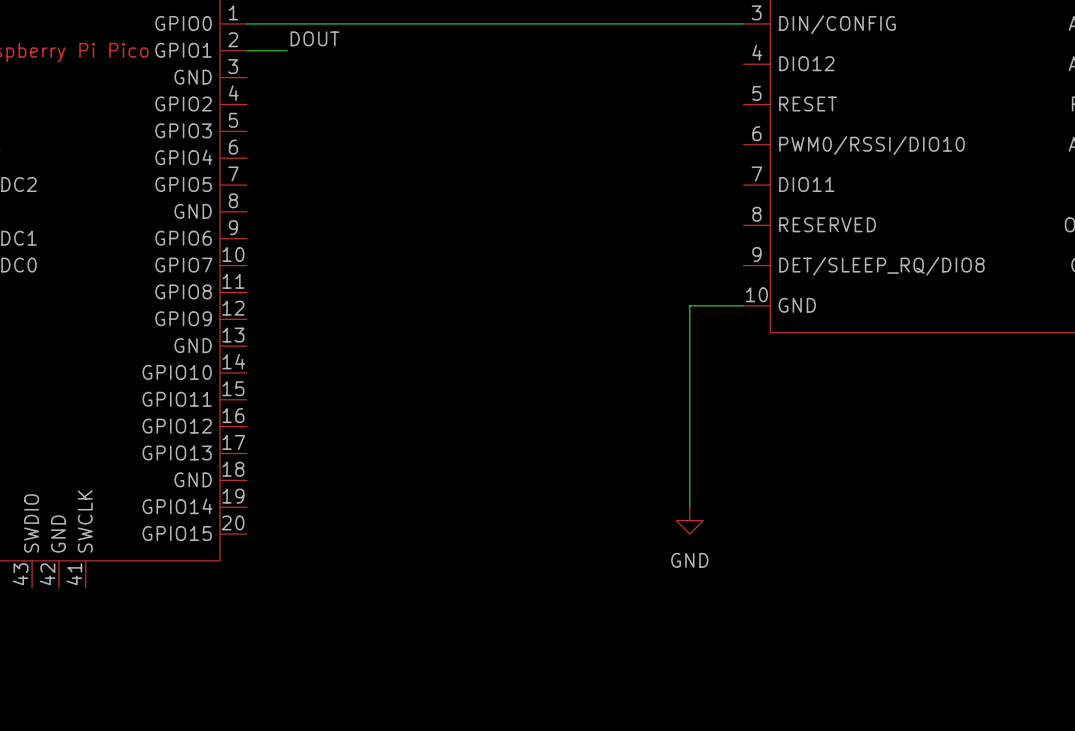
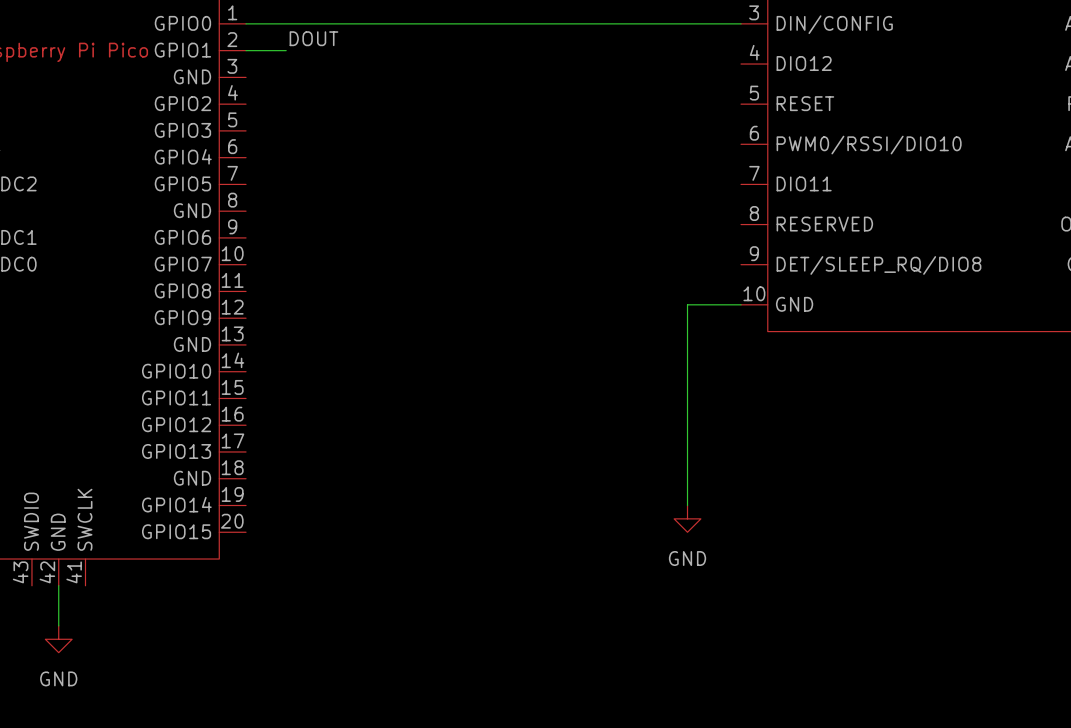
wire: none -> (58, 585) (58, 625)
power symbol: none -> GND (58, 639)

